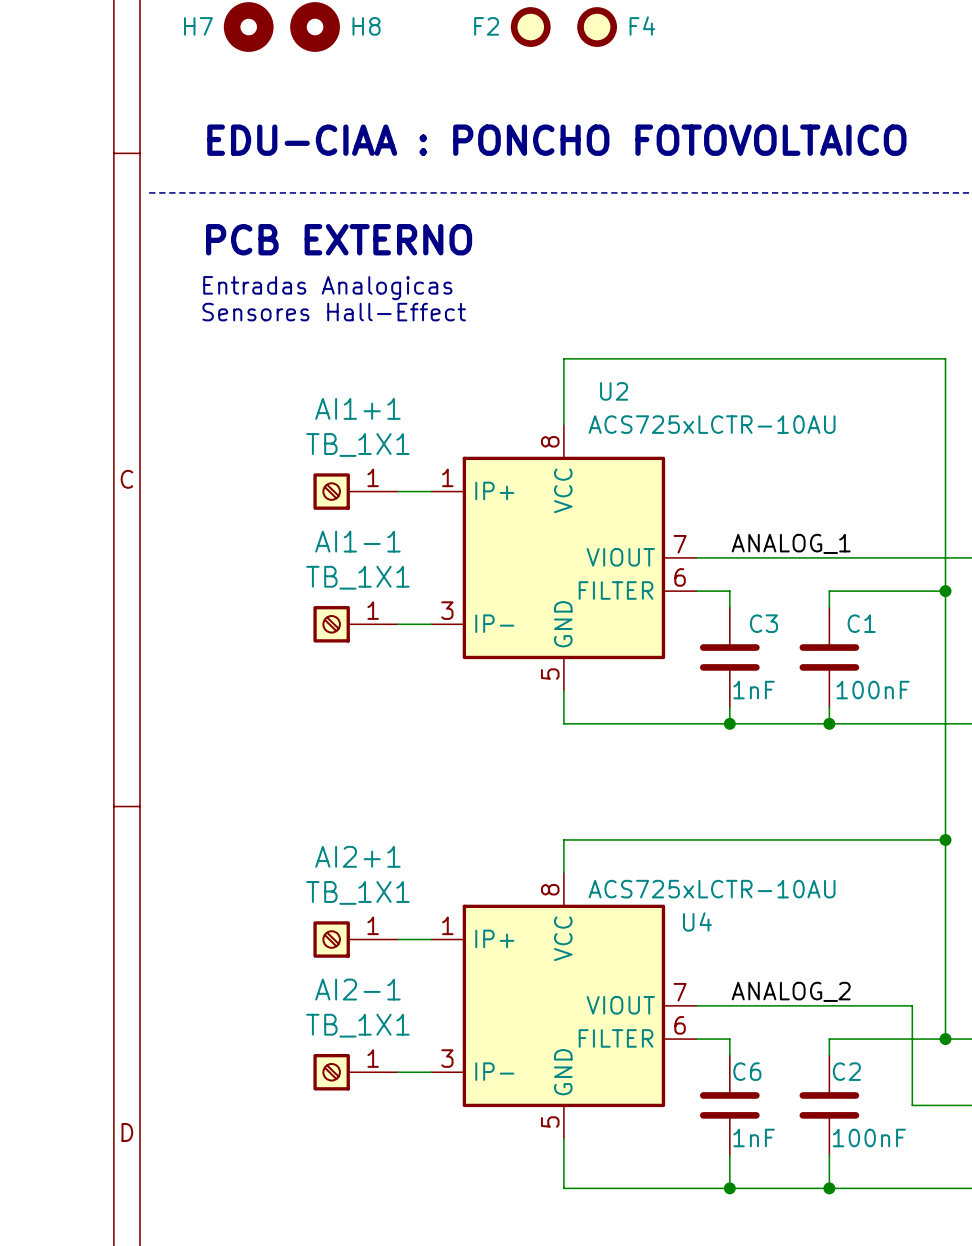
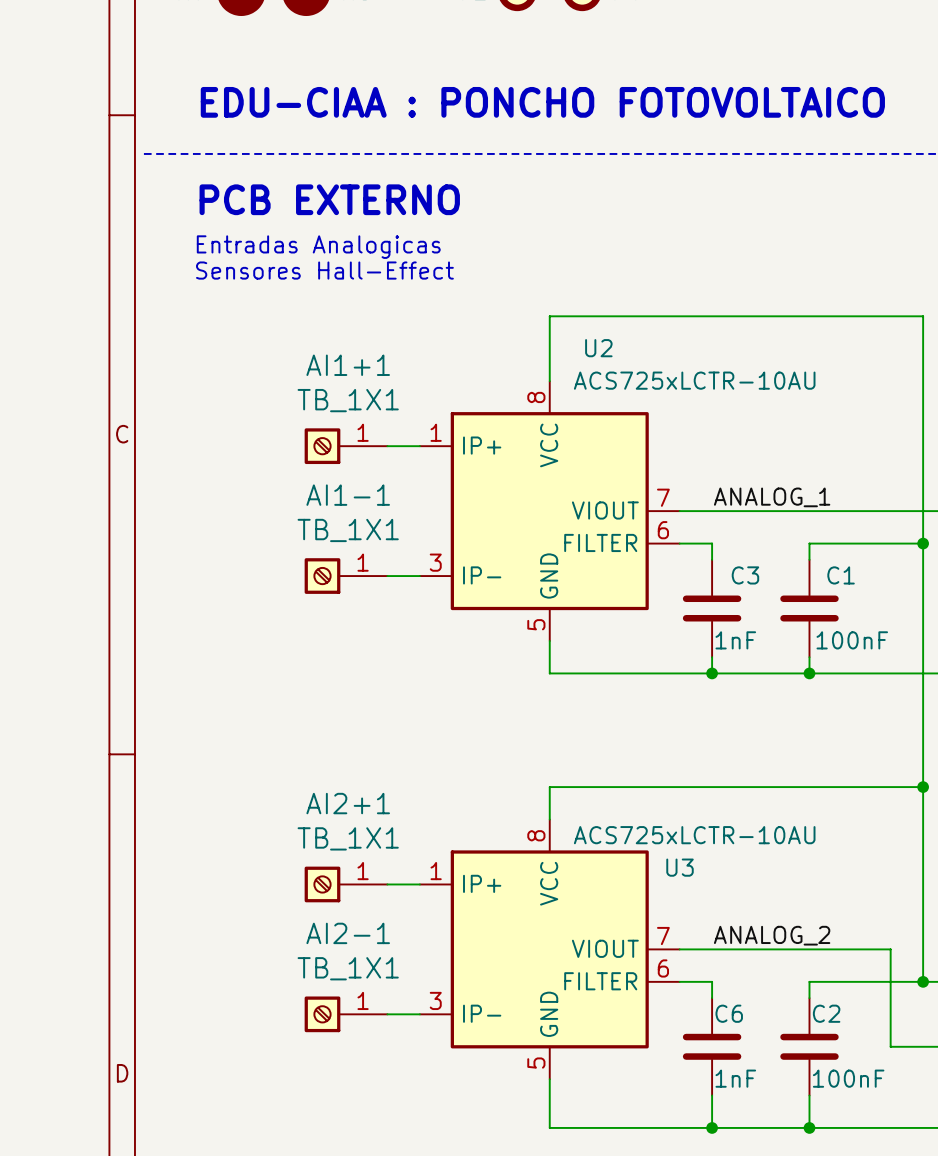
U4 name: U4 (697, 921) -> U3 (680, 867)

